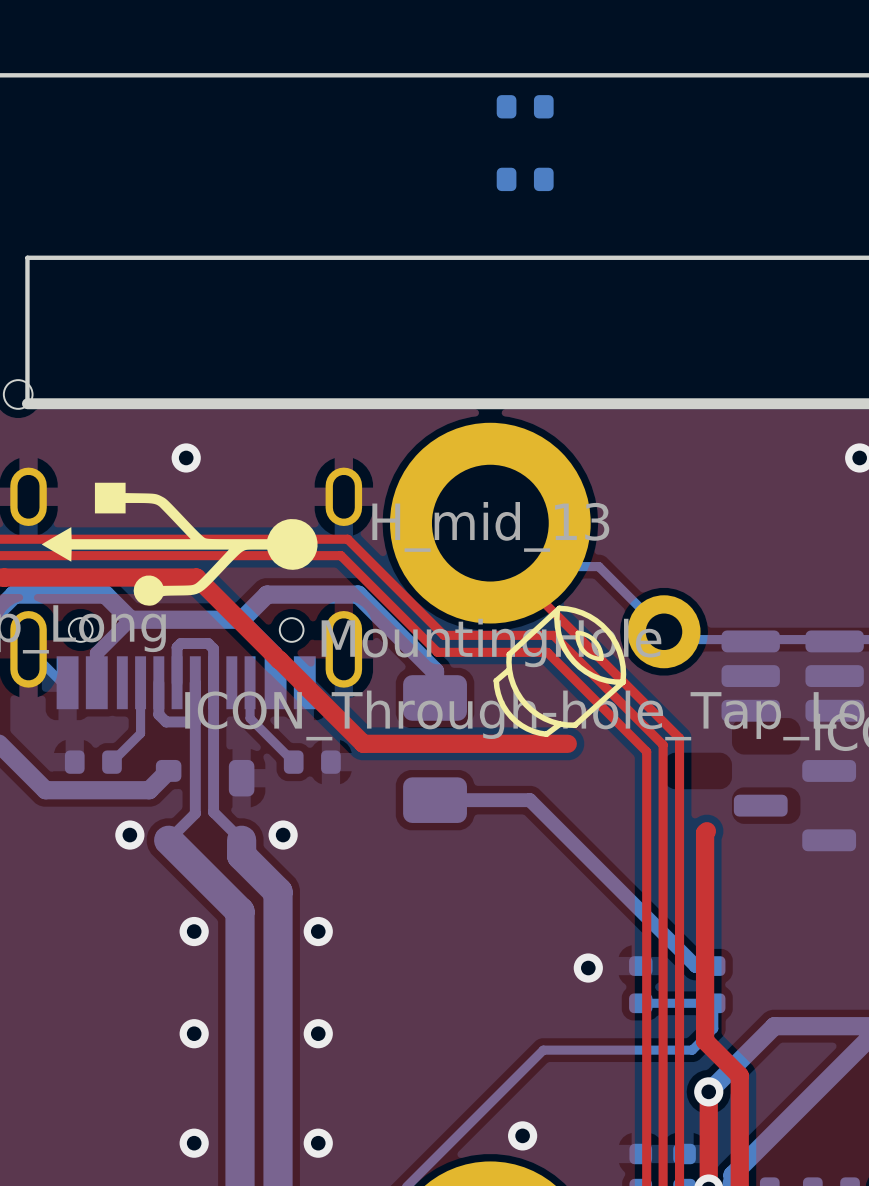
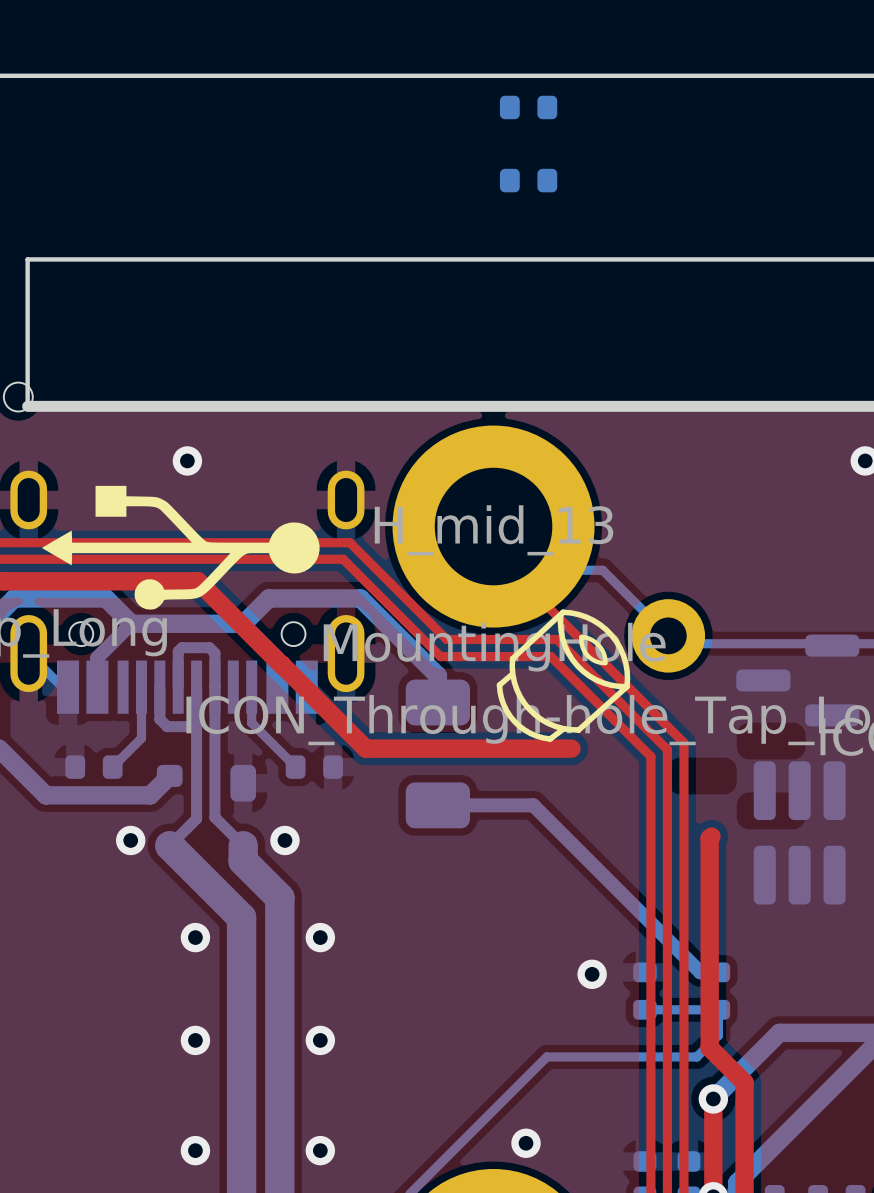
part footprint: [721, 630, 864, 722] -> [736, 634, 860, 727]
part footprint: [733, 760, 857, 852] -> [753, 761, 846, 905]

